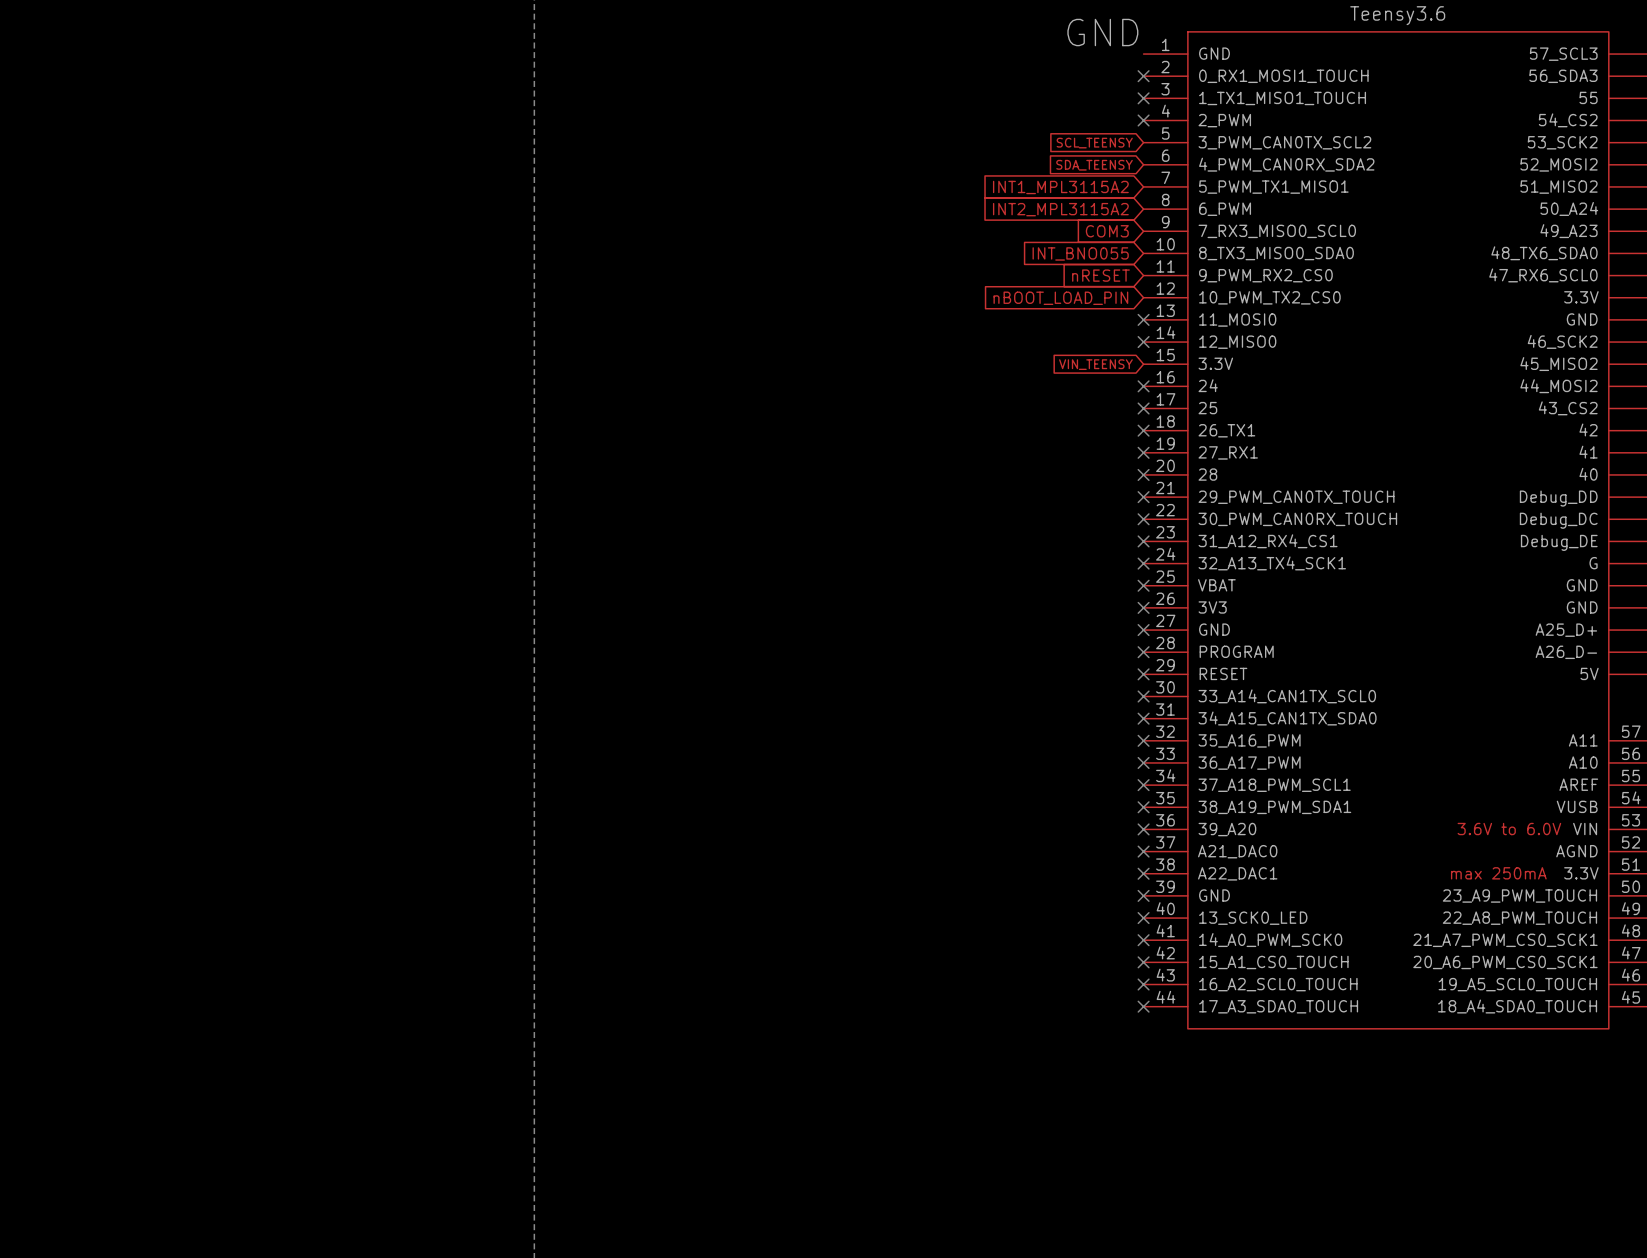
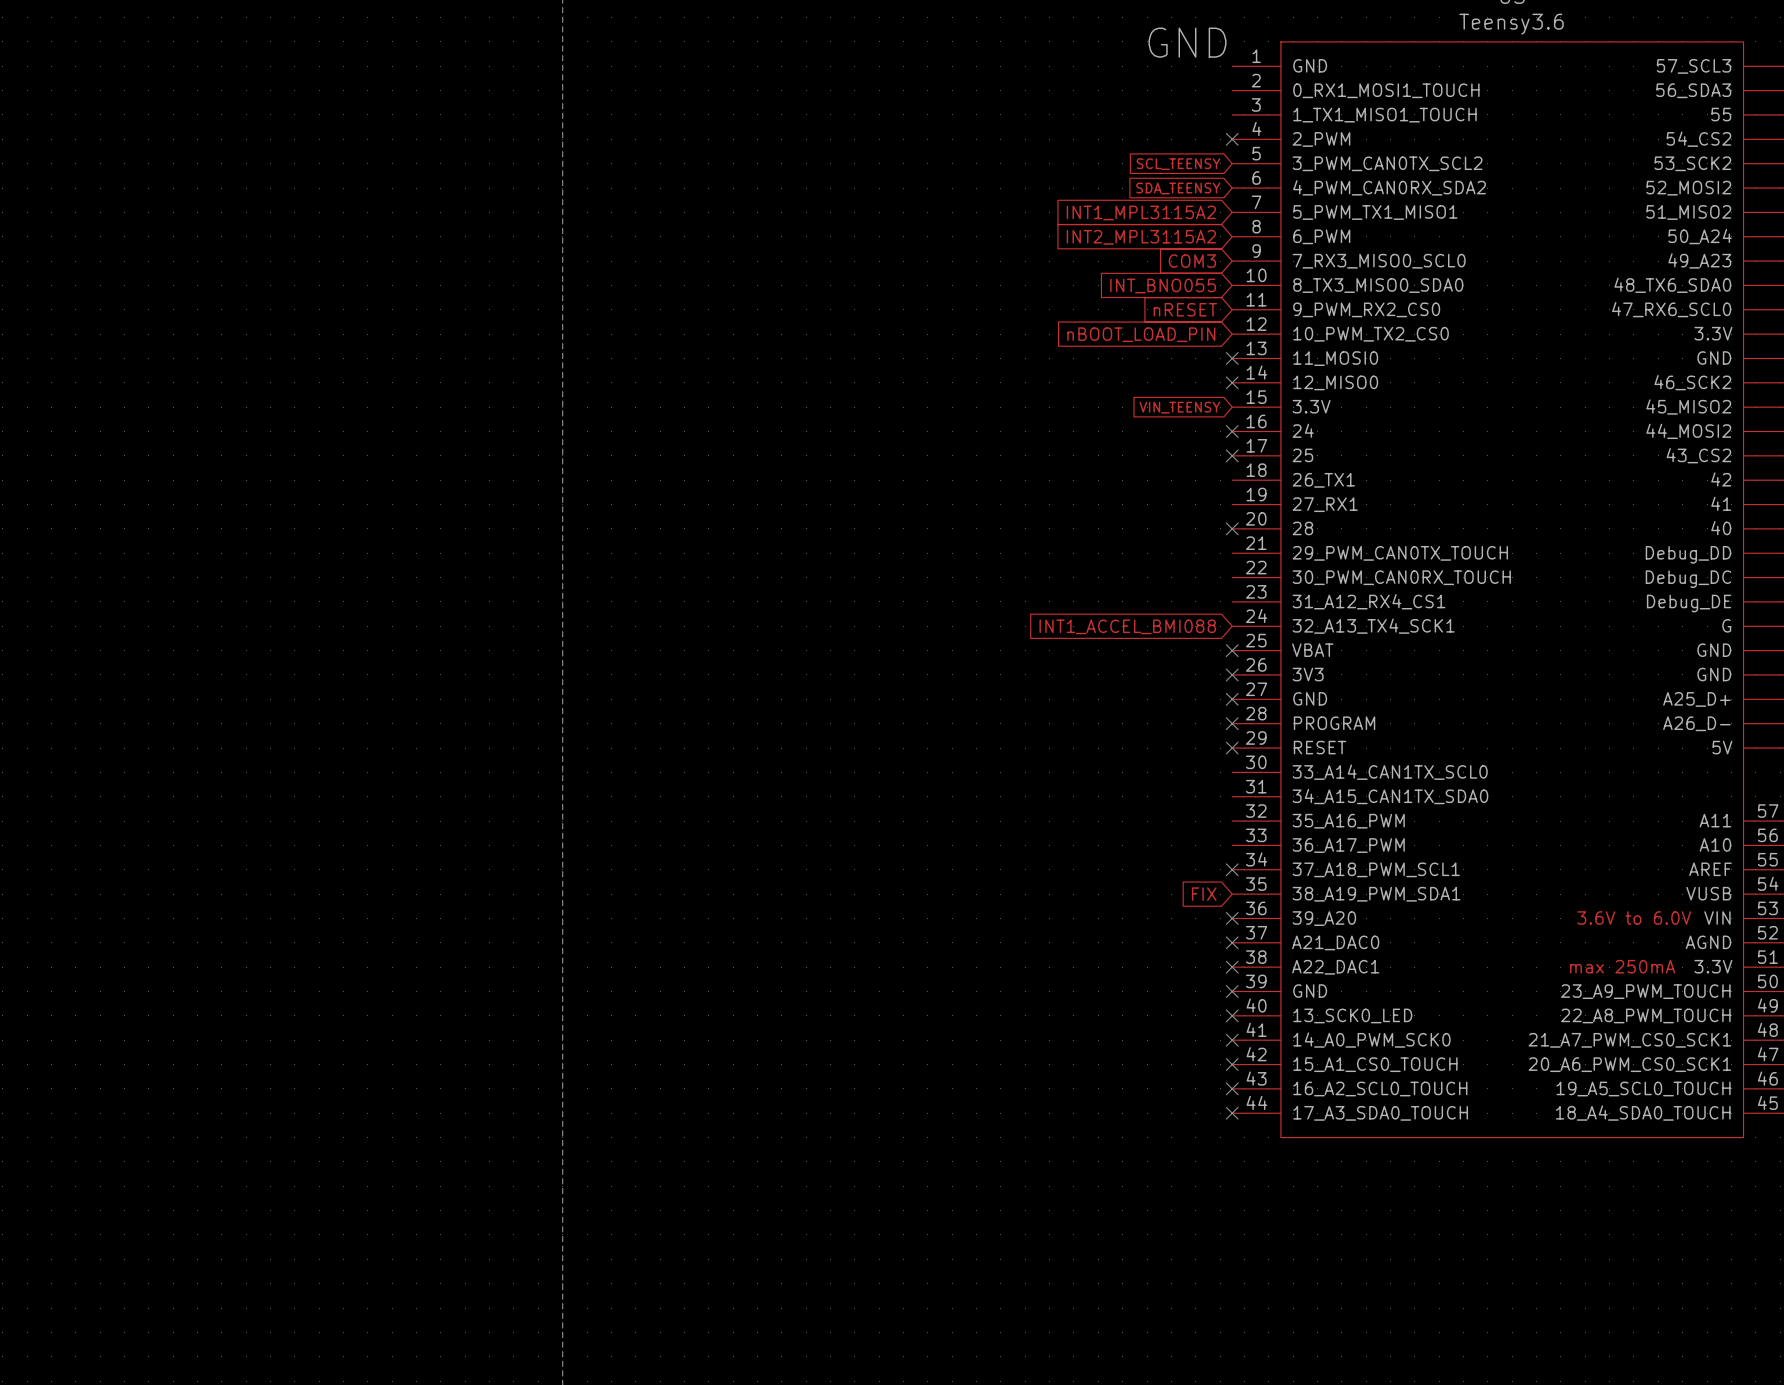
no-connect mark: (1143, 76) -> none
no-connect mark: (1143, 98) -> none
no-connect mark: (1143, 430) -> none
no-connect mark: (1143, 452) -> none
no-connect mark: (1143, 497) -> none
no-connect mark: (1143, 519) -> none
no-connect mark: (1143, 541) -> none
no-connect mark: (1143, 563) -> none
global label: none -> INT1_ACCEL_BMI088 (1127, 626)
no-connect mark: (1143, 696) -> none
no-connect mark: (1143, 718) -> none
no-connect mark: (1143, 740) -> none
no-connect mark: (1143, 762) -> none
global label: none -> FIX (1204, 894)
no-connect mark: (1143, 807) -> none

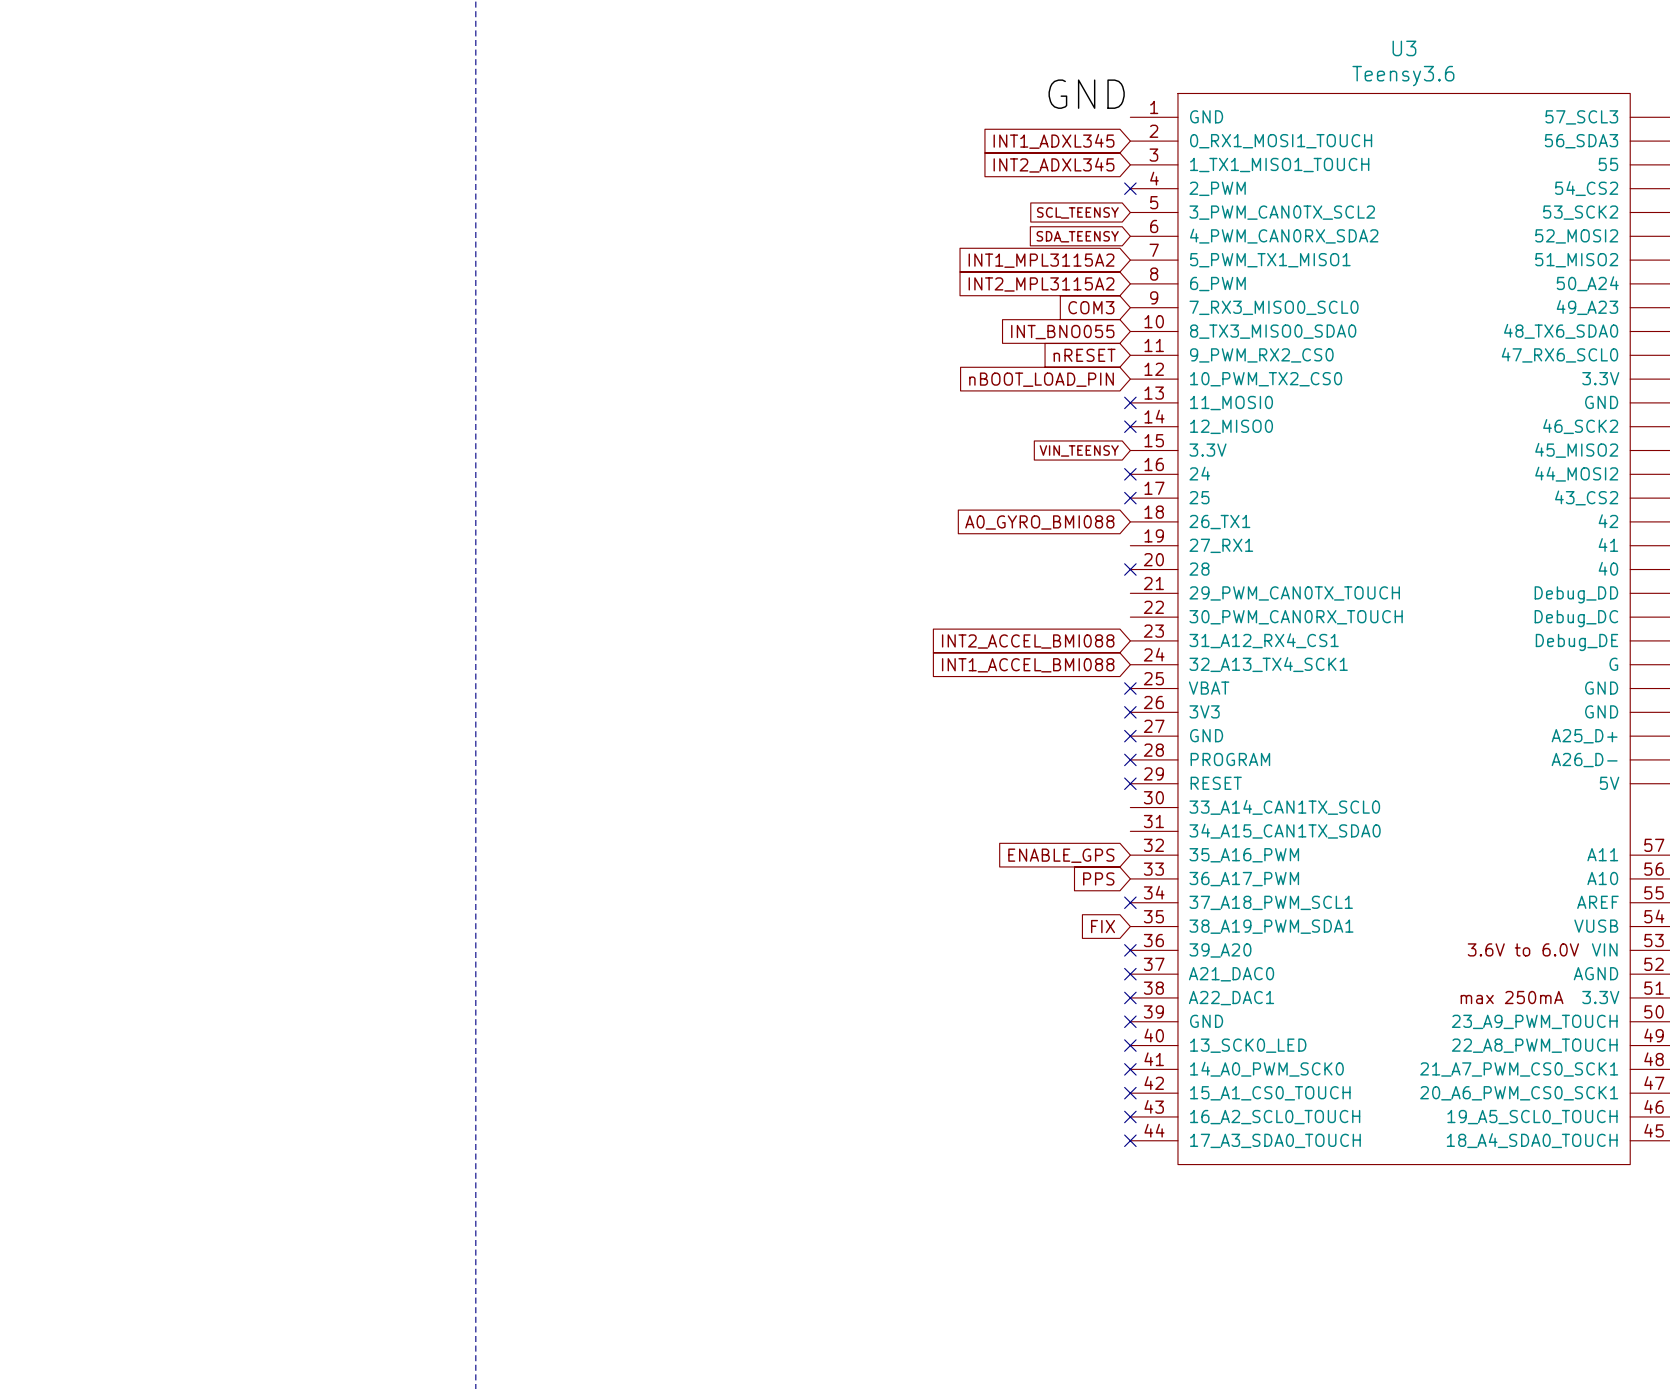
global label: none -> INT1_ADXL345 (1053, 141)
global label: none -> INT2_ADXL345 (1053, 165)
global label: none -> A0_GYRO_BMI088 (1039, 522)
global label: none -> INT2_ACCEL_BMI088 (1028, 641)
global label: none -> ENABLE_GPS (1061, 855)
global label: none -> PPS (1098, 878)

